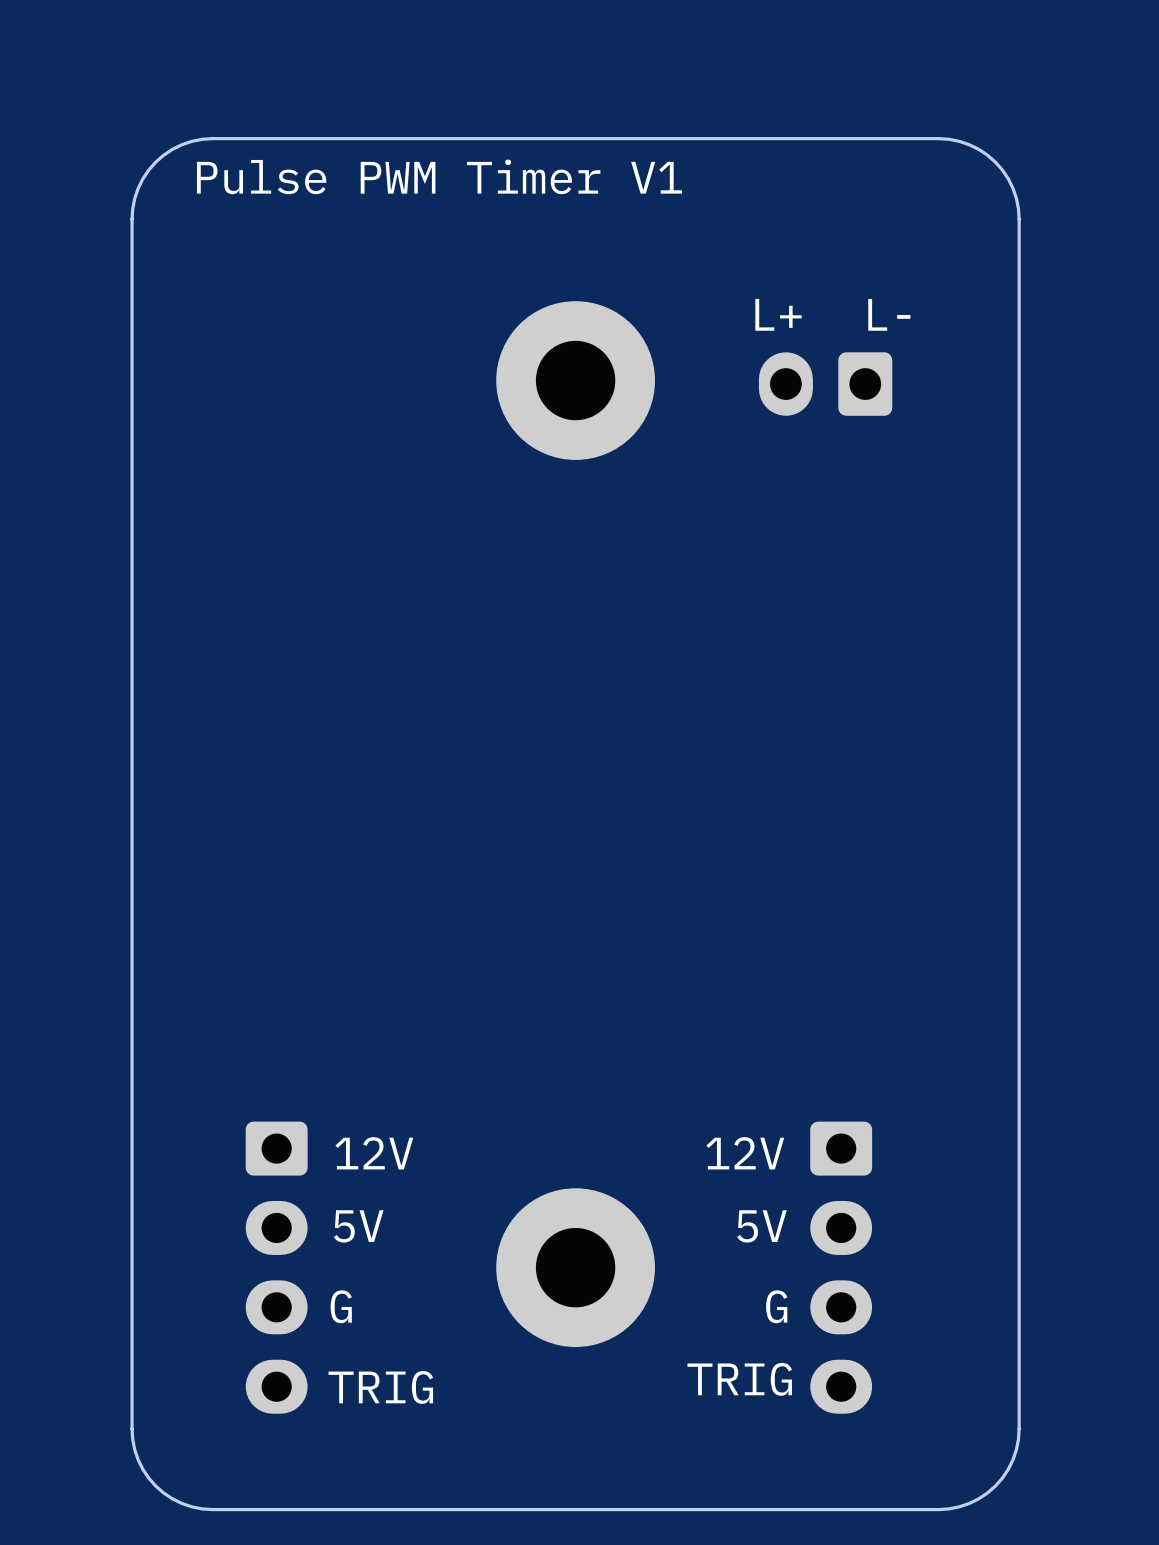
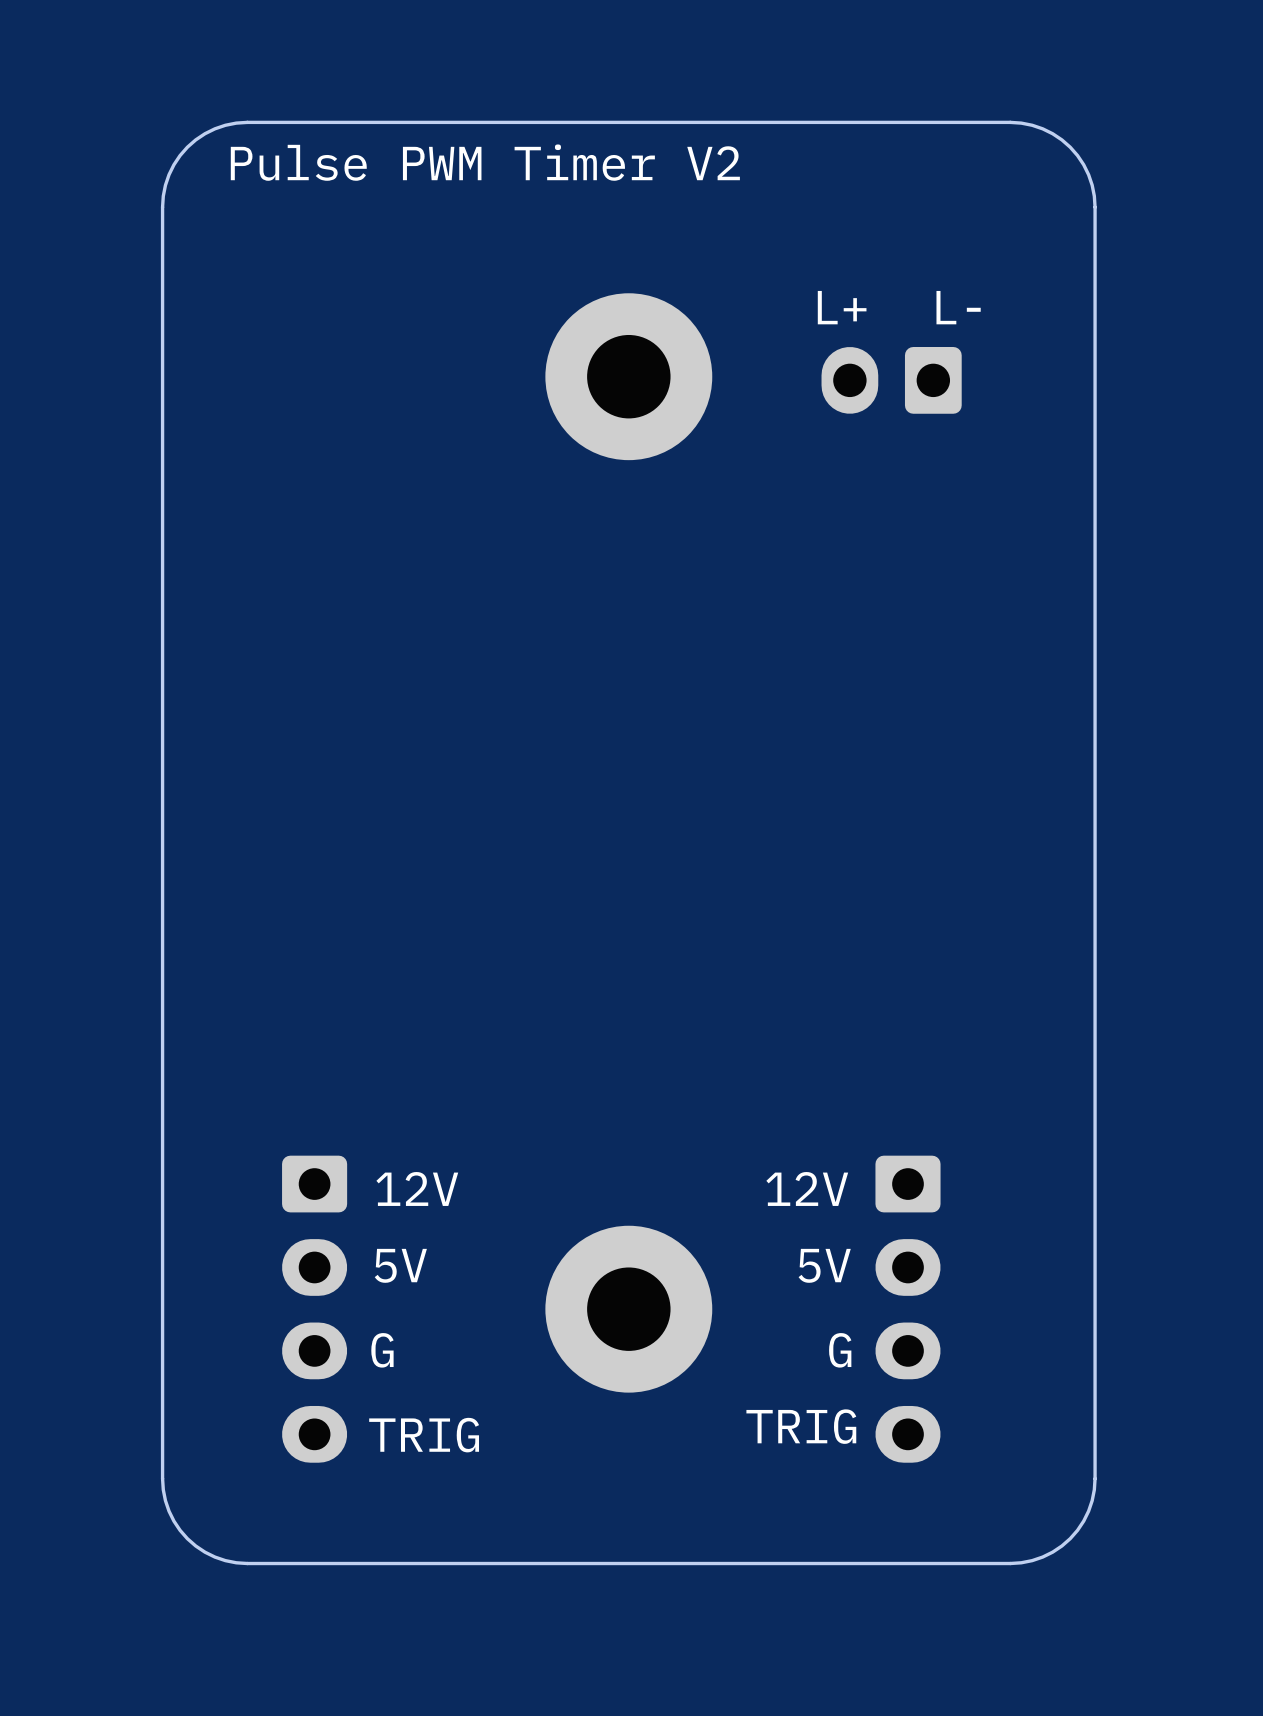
text: Pulse PWM Timer V1 (439, 176) -> Pulse PWM Timer V2 (485, 162)

